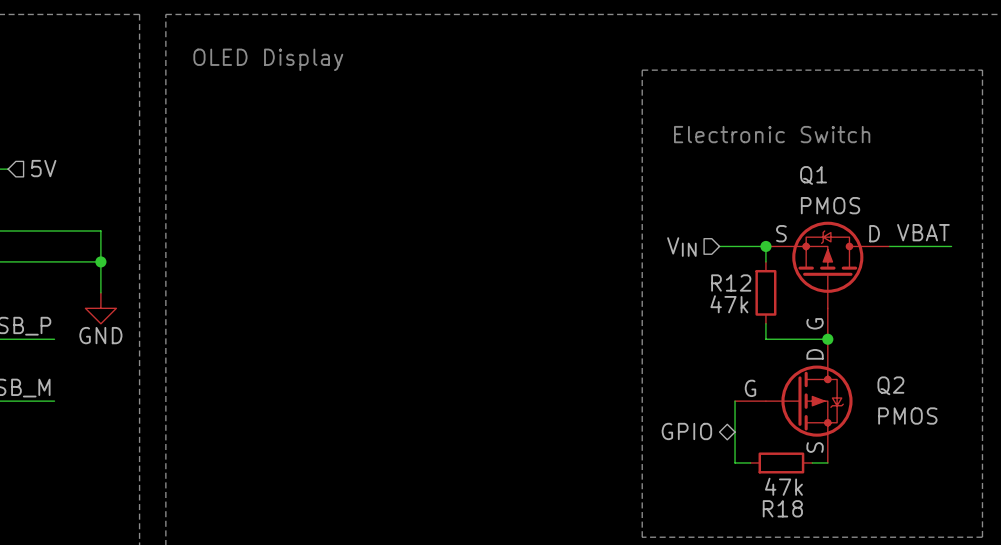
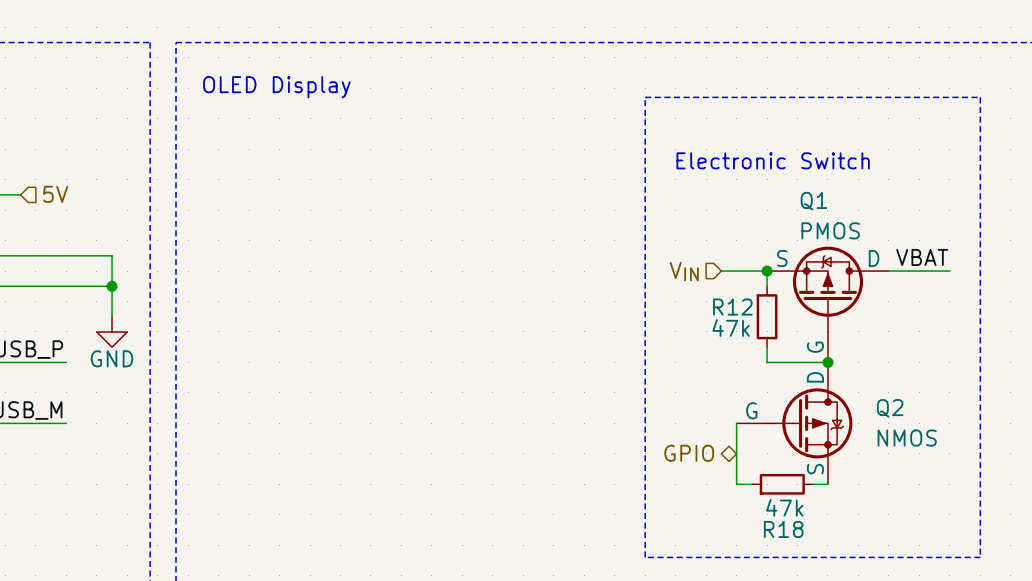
Q2 value: PMOS (907, 416) -> NMOS (907, 438)

